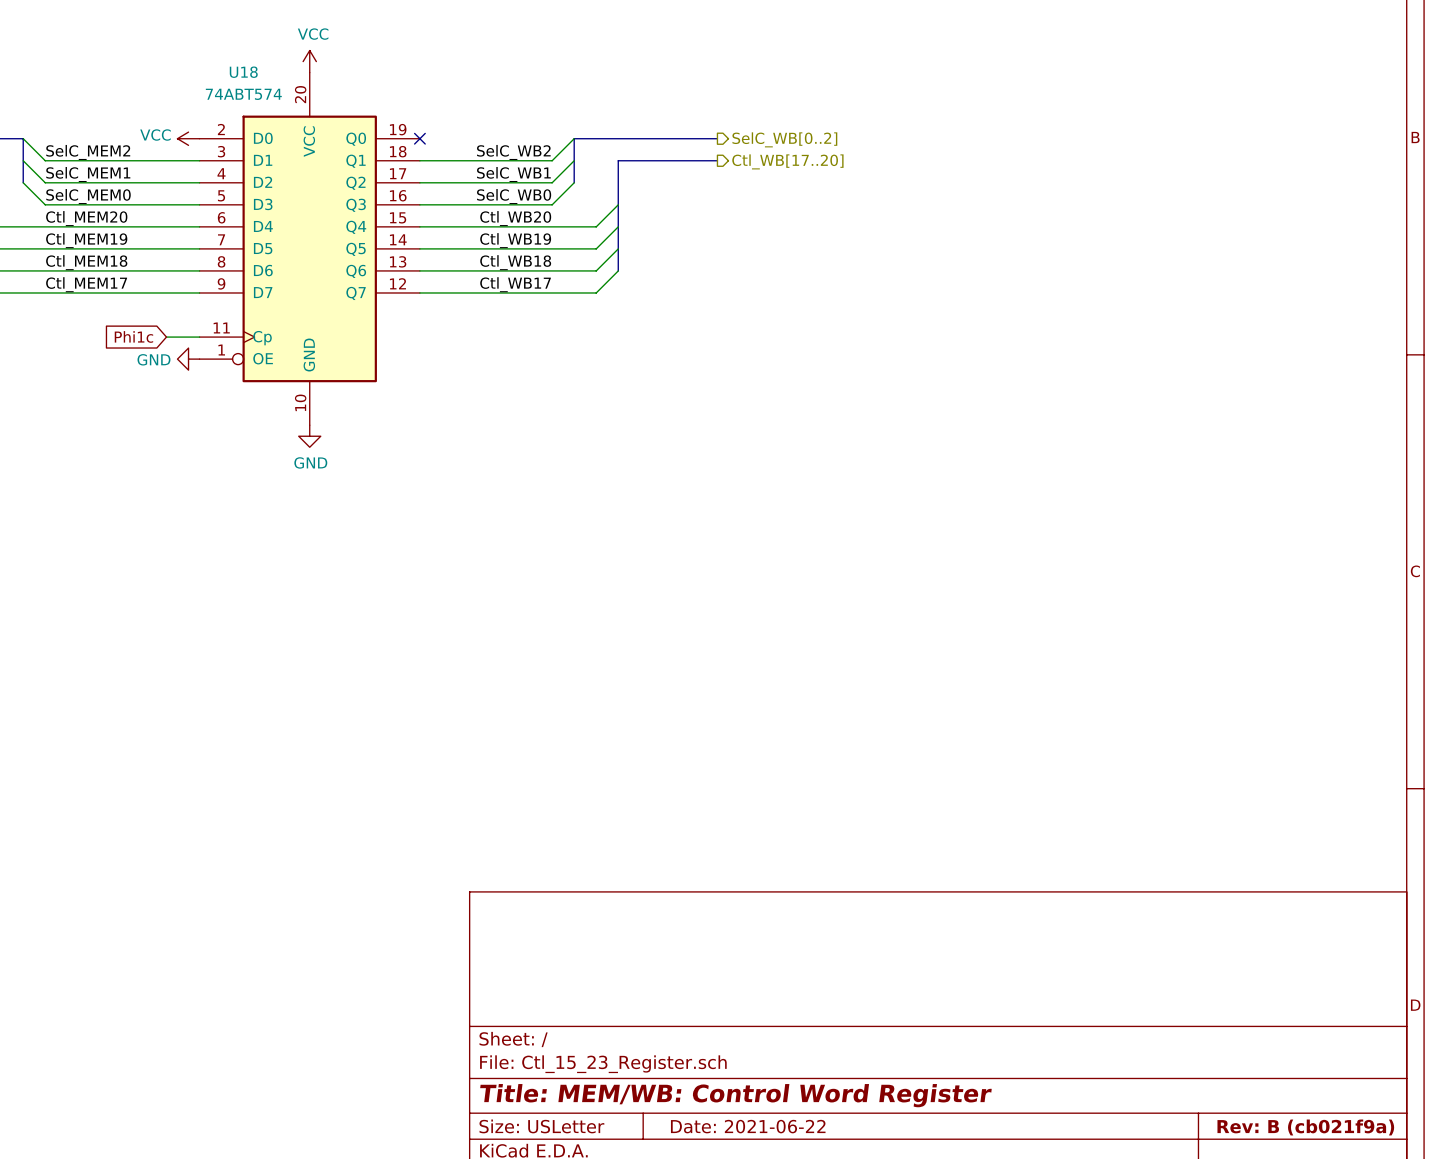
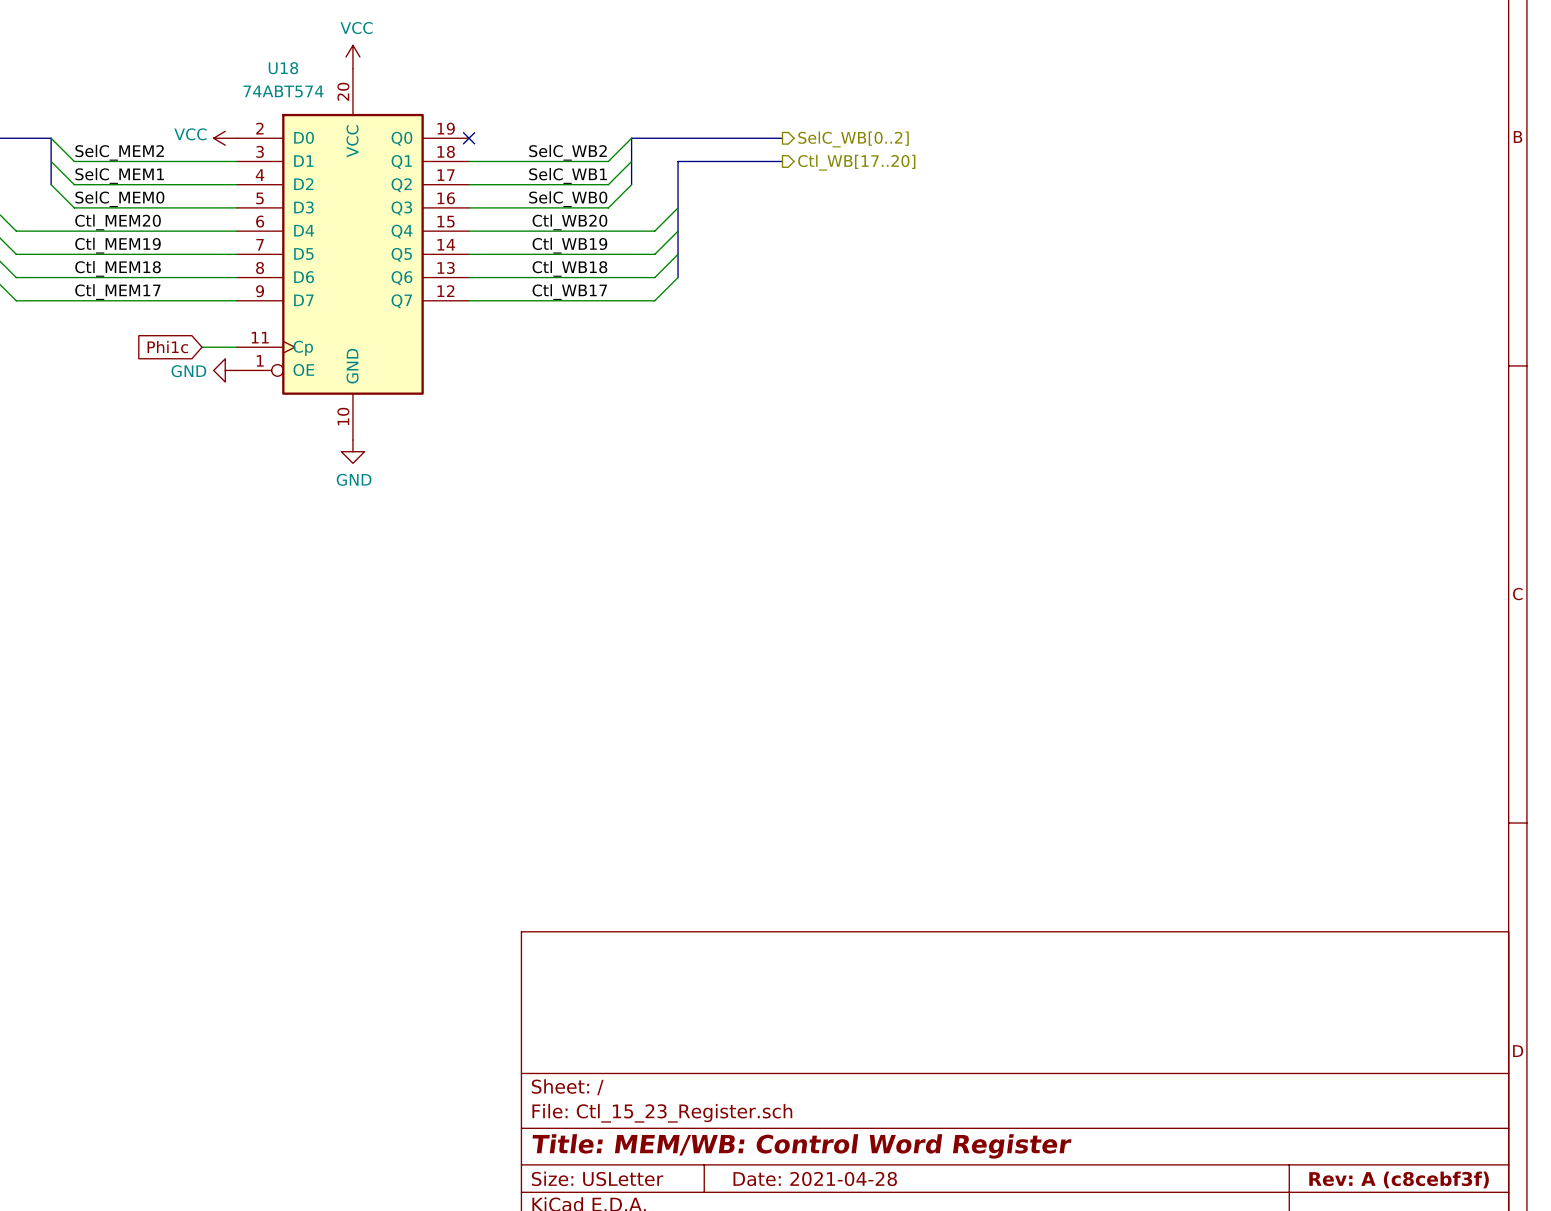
title block: Date: 2021-06-22 (748, 1126) -> Date: 2021-04-28 (815, 1179)
title block: Rev: B (cb021f9a) (1305, 1127) -> Rev: A (c8cebf3f) (1399, 1179)

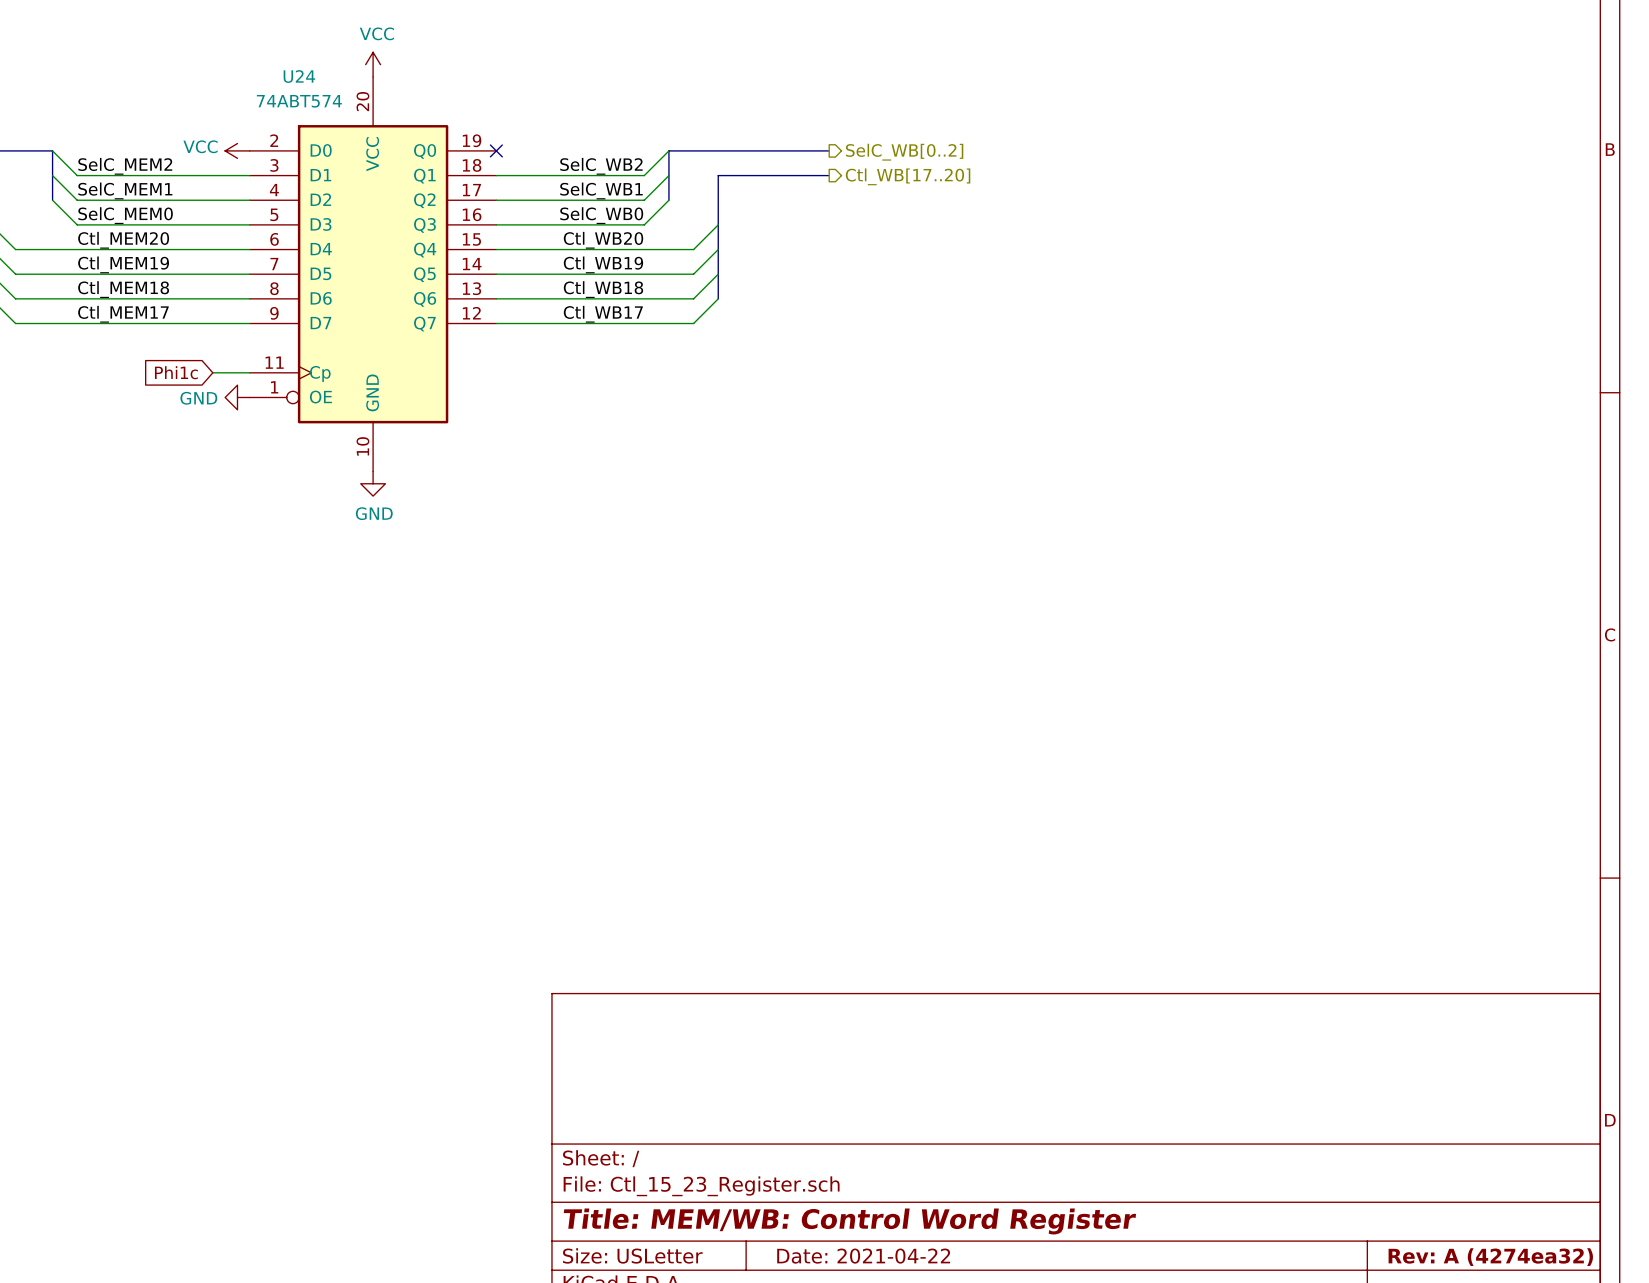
U18 name: U18 (283, 68) -> U24 (299, 76)
title block: Date: 2021-04-28 (815, 1179) -> Date: 2021-04-22 (863, 1256)
title block: Rev: A (c8cebf3f) (1399, 1179) -> Rev: A (4274ea32) (1490, 1257)

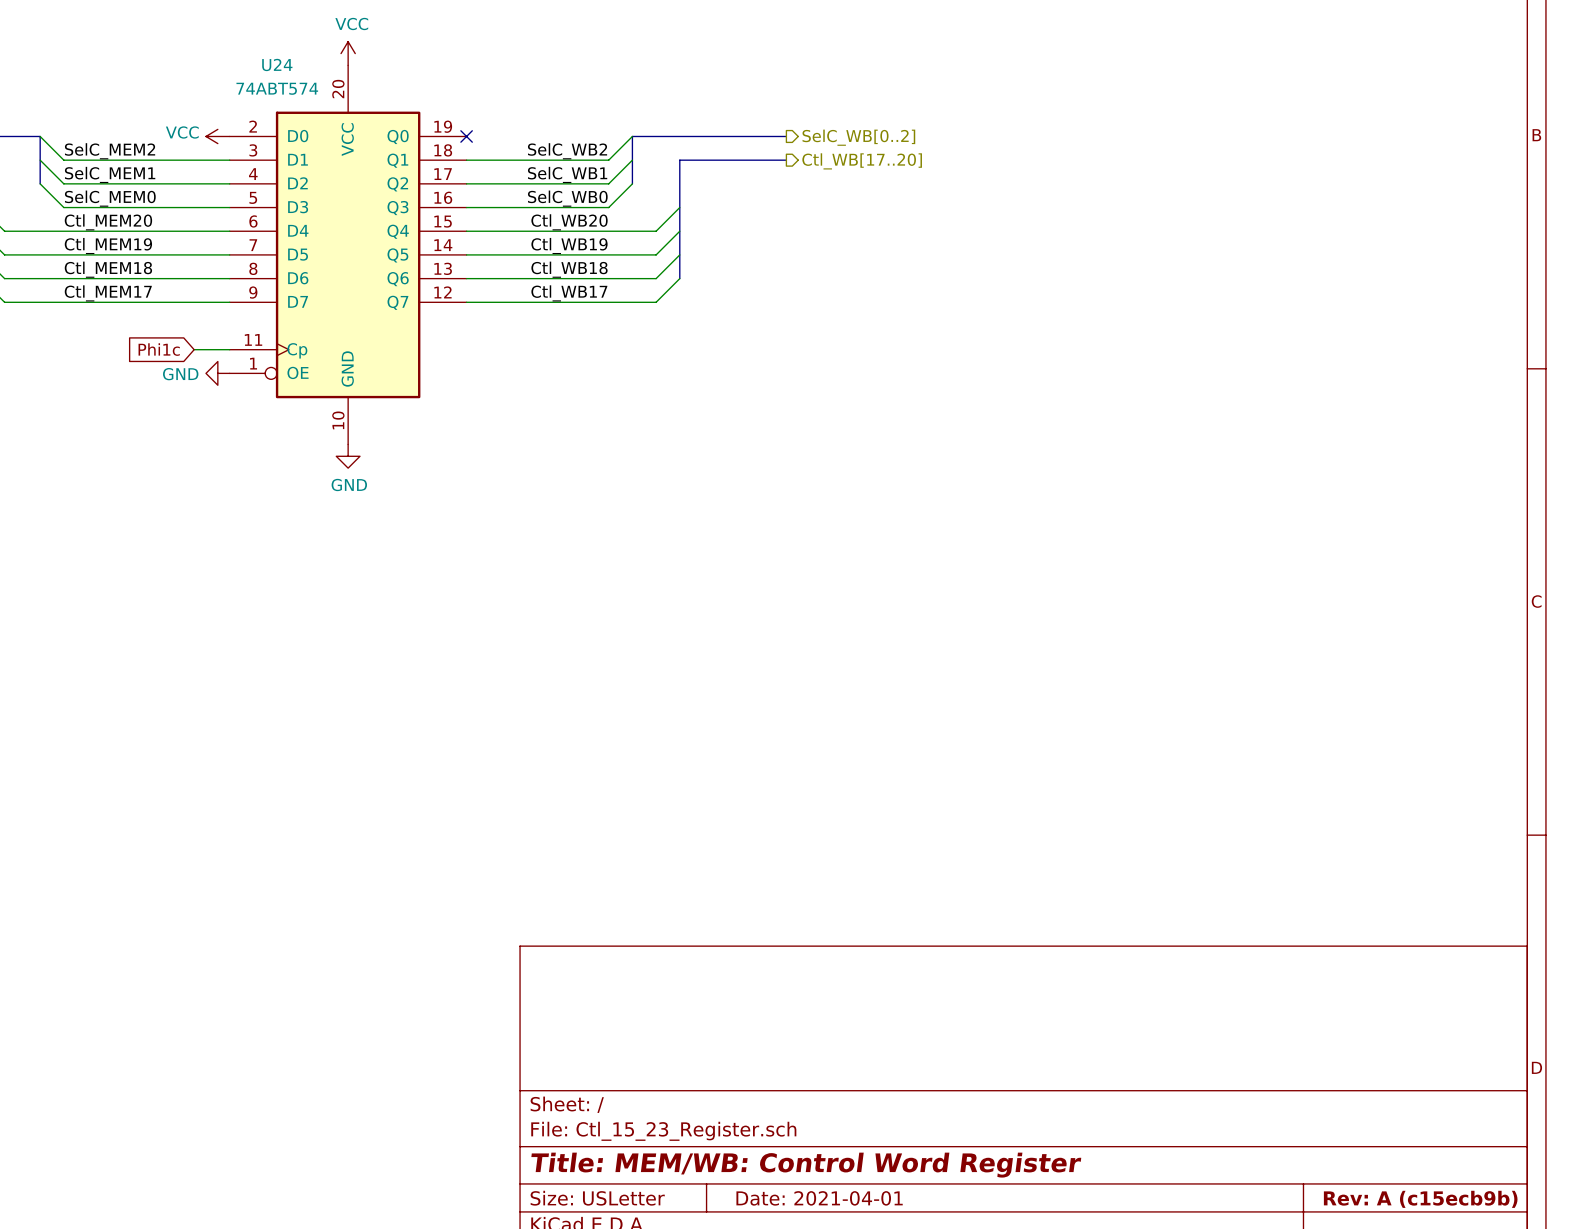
title block: Date: 2021-04-22 (863, 1256) -> Date: 2021-04-01 (819, 1198)
title block: Rev: A (4274ea32) (1490, 1257) -> Rev: A (c15ecb9b) (1420, 1199)

